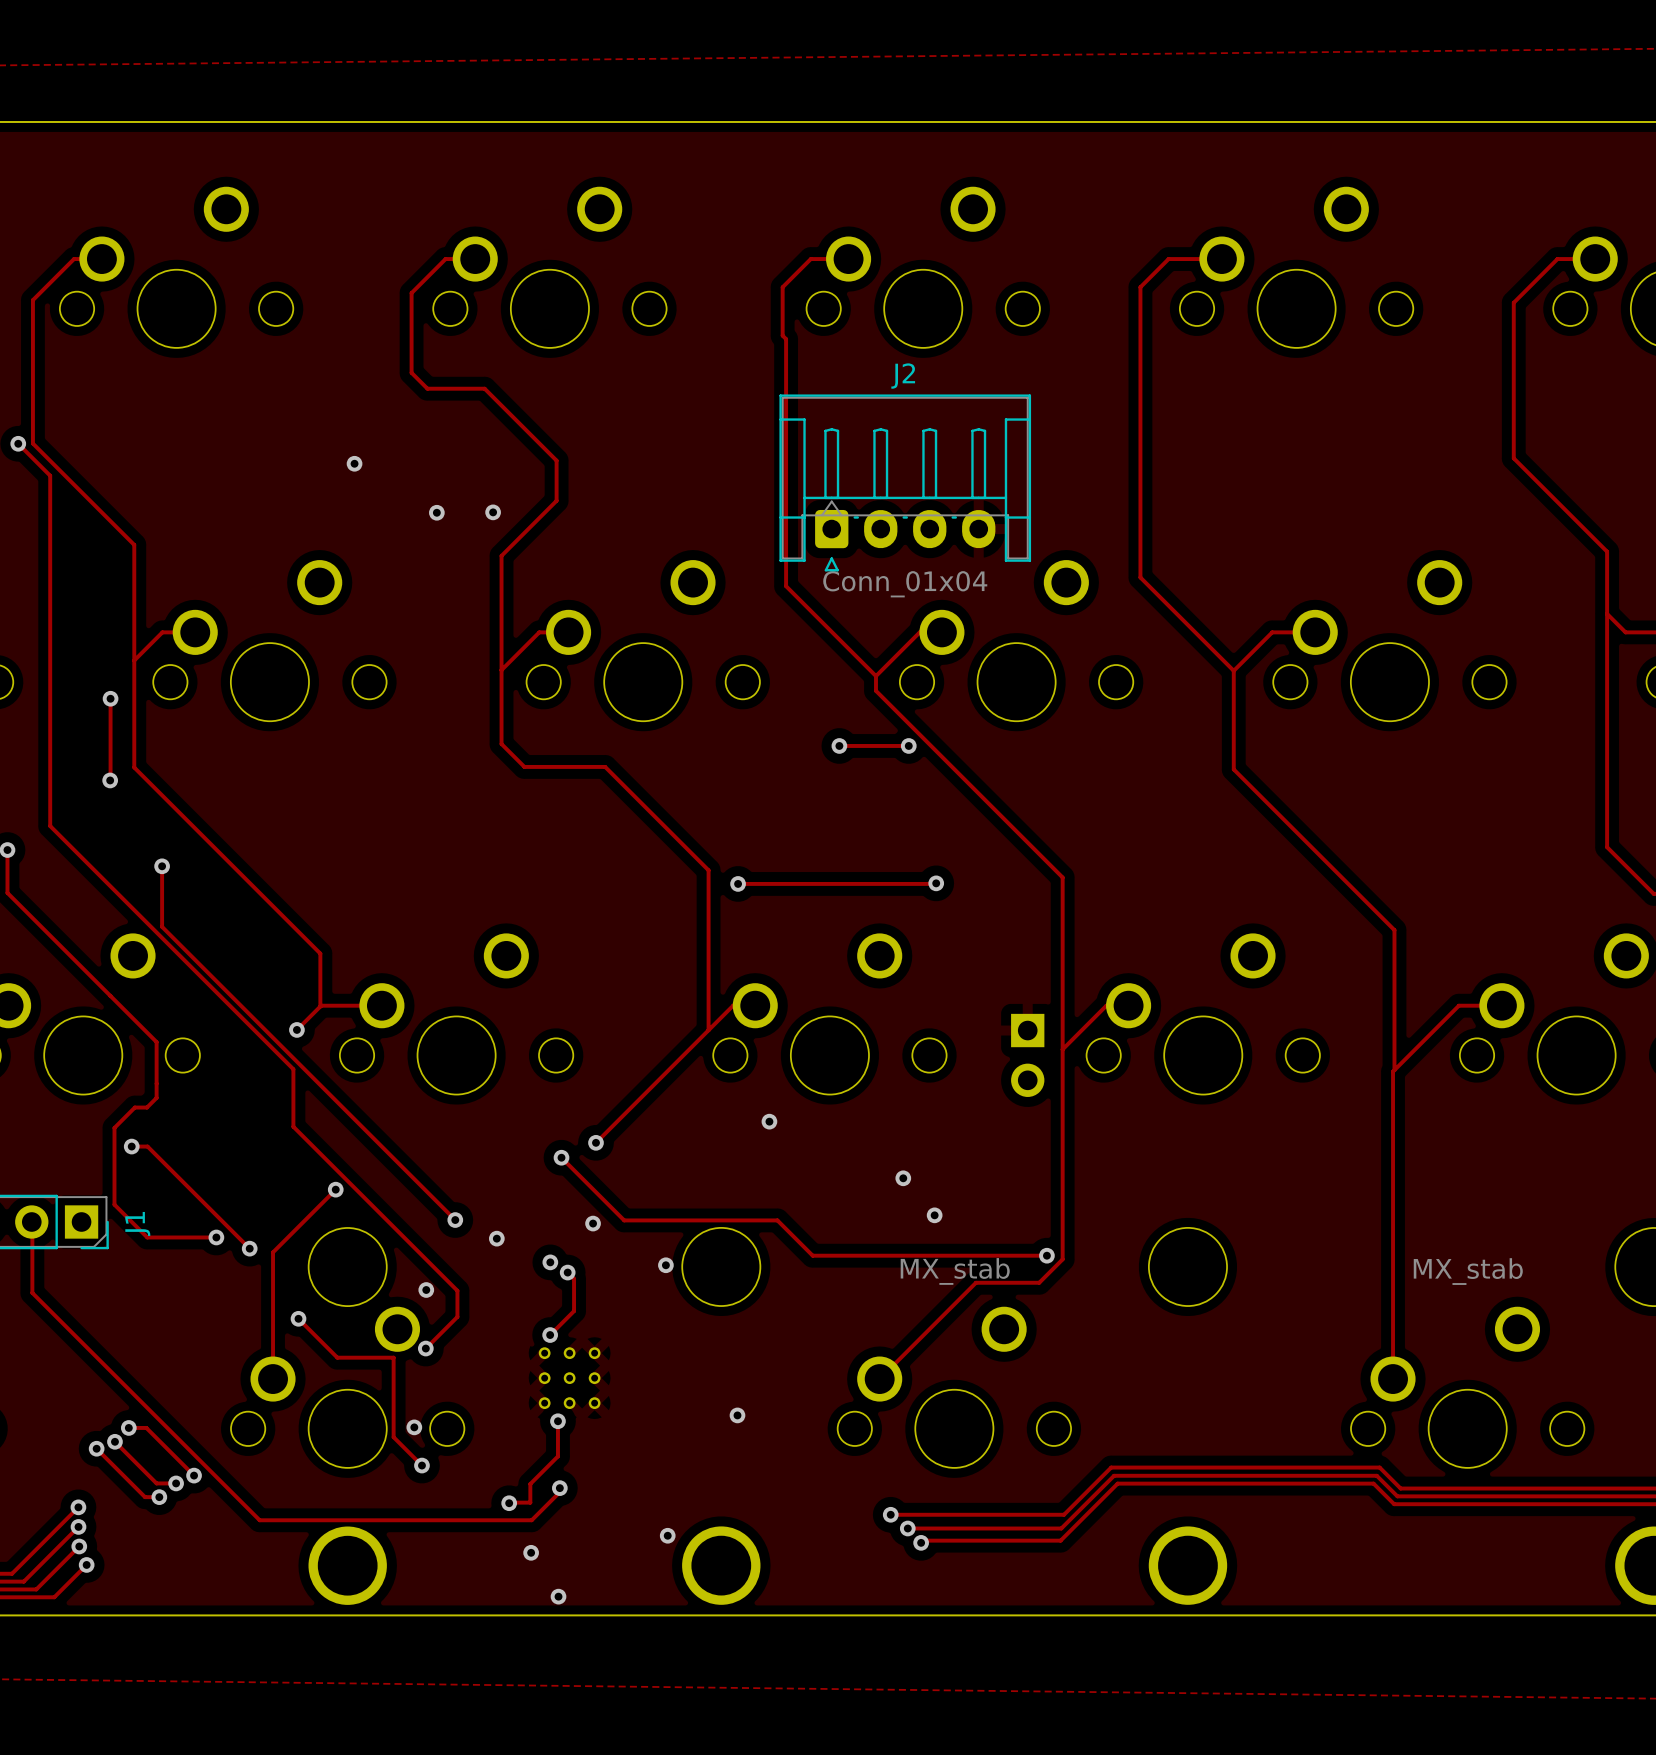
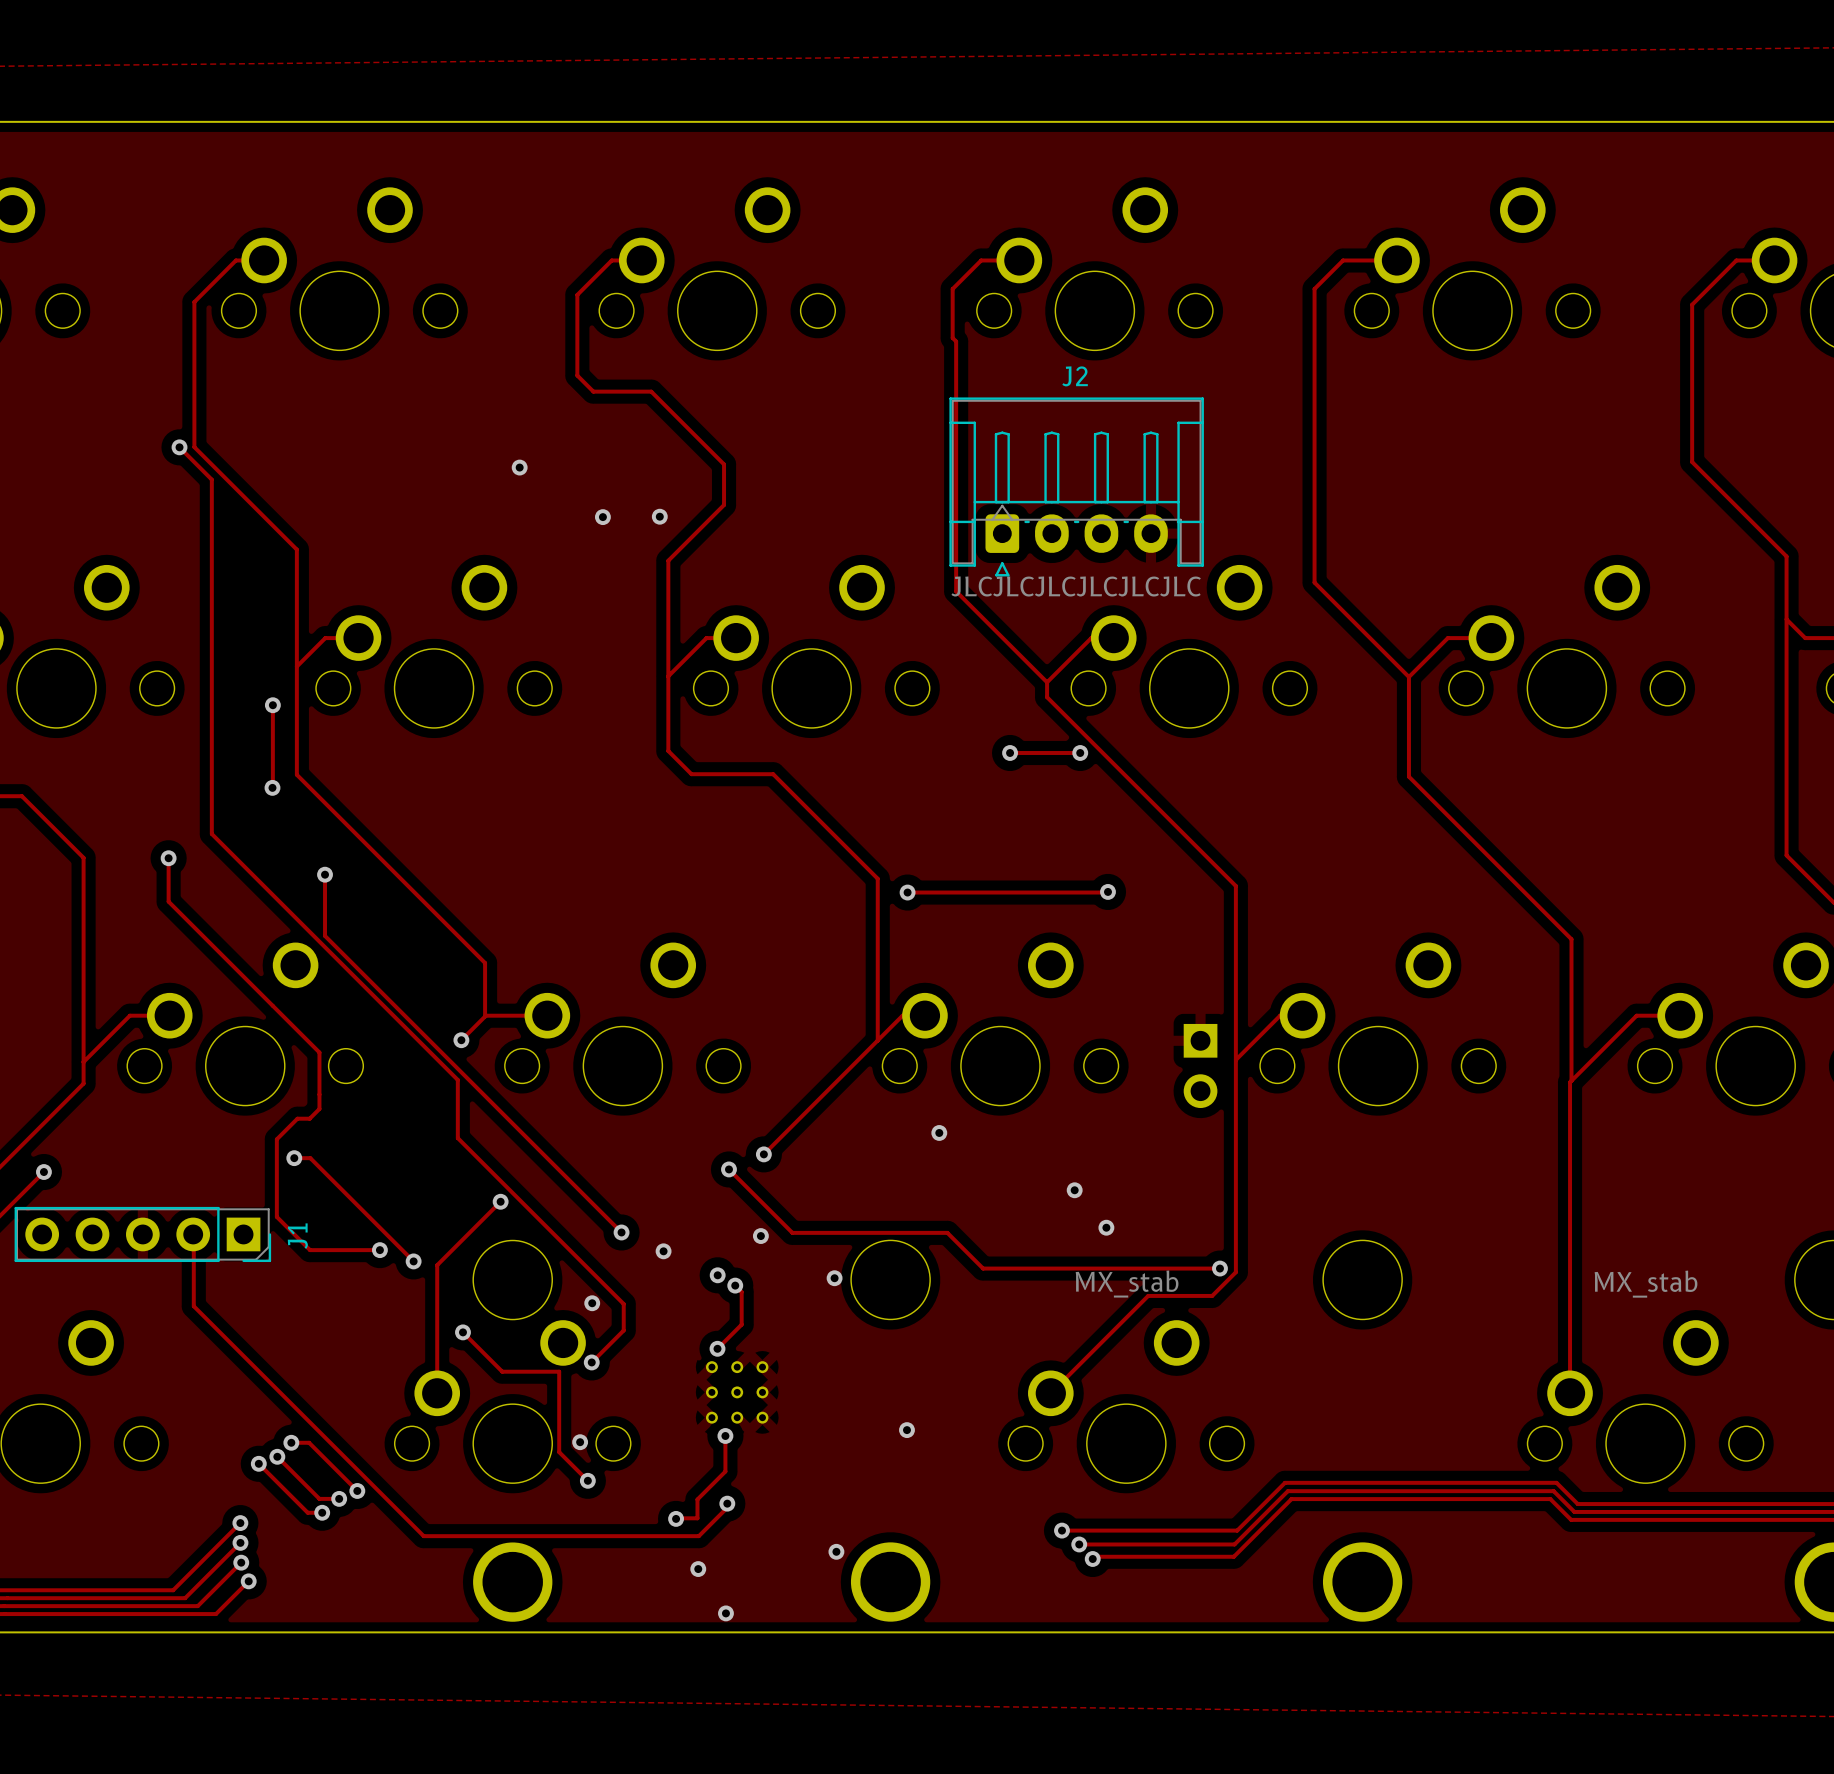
J2 value: Conn_01x04 (905, 584) -> JLCJLCJLCJLCJLCJLC (1076, 586)

